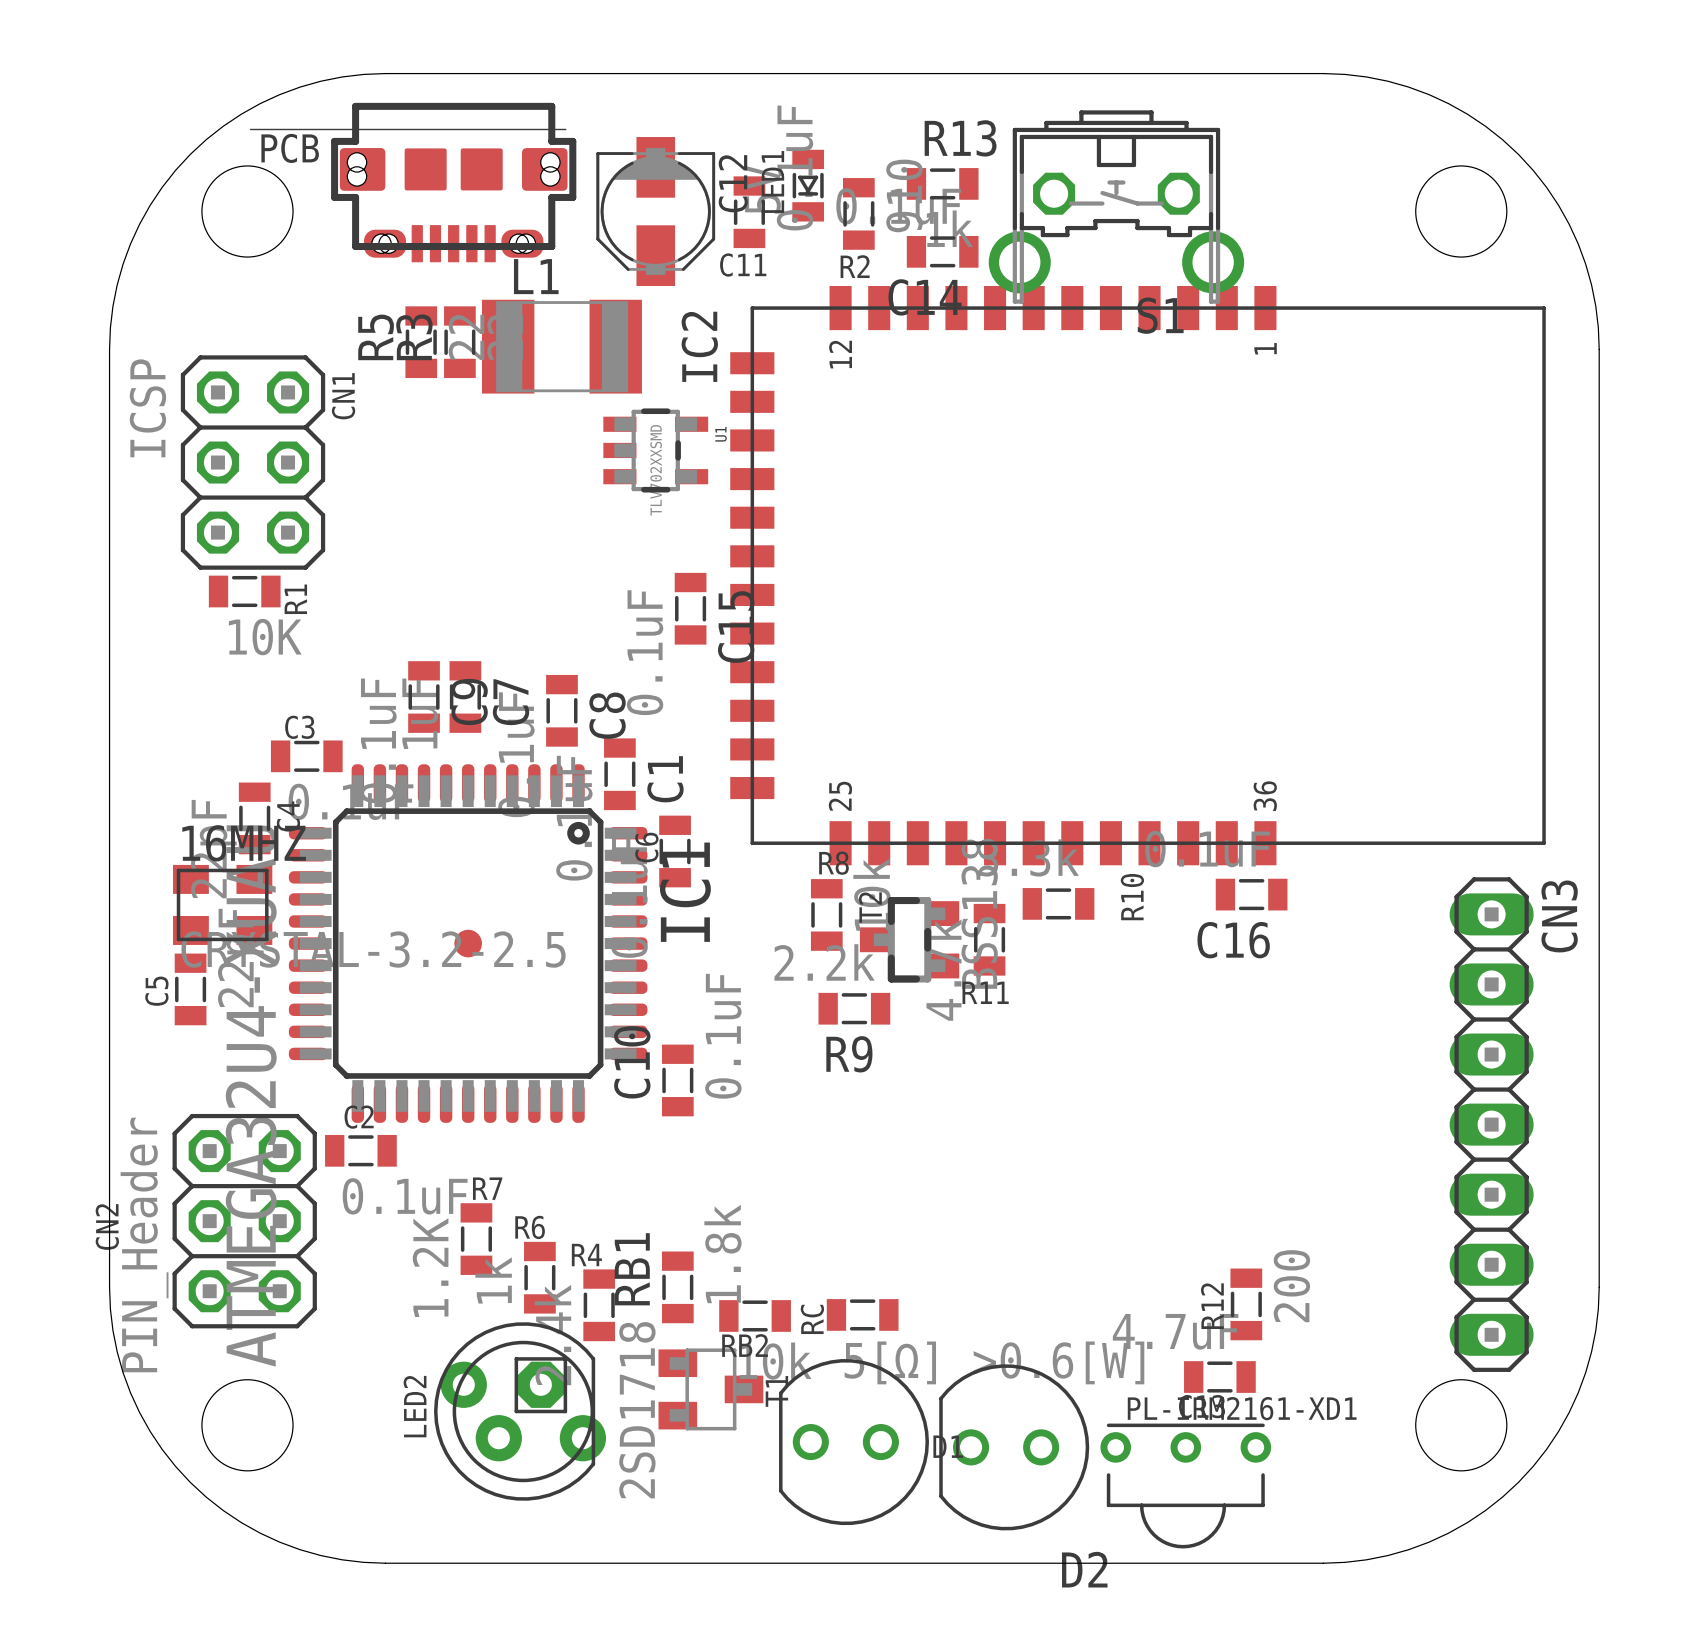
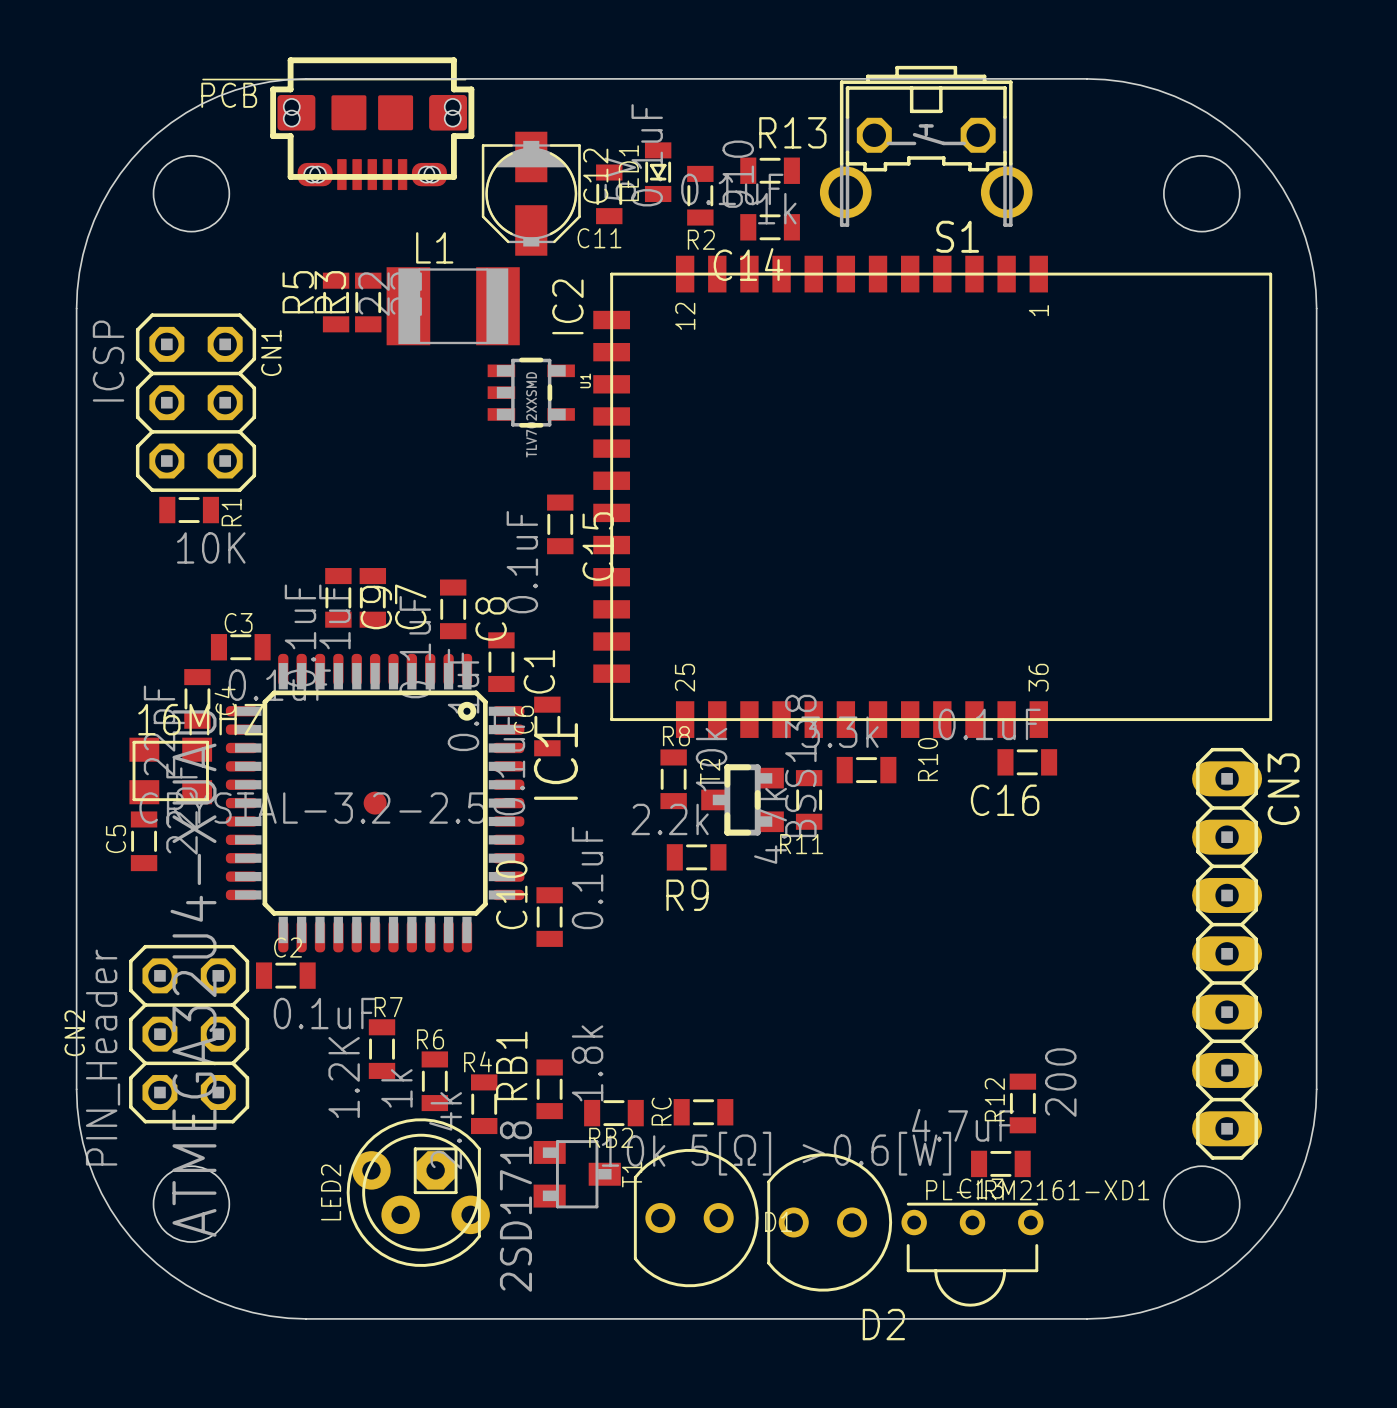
part position: (413, 182) -> (338, 123)
S1 position: (1116, 207) -> (926, 146)

